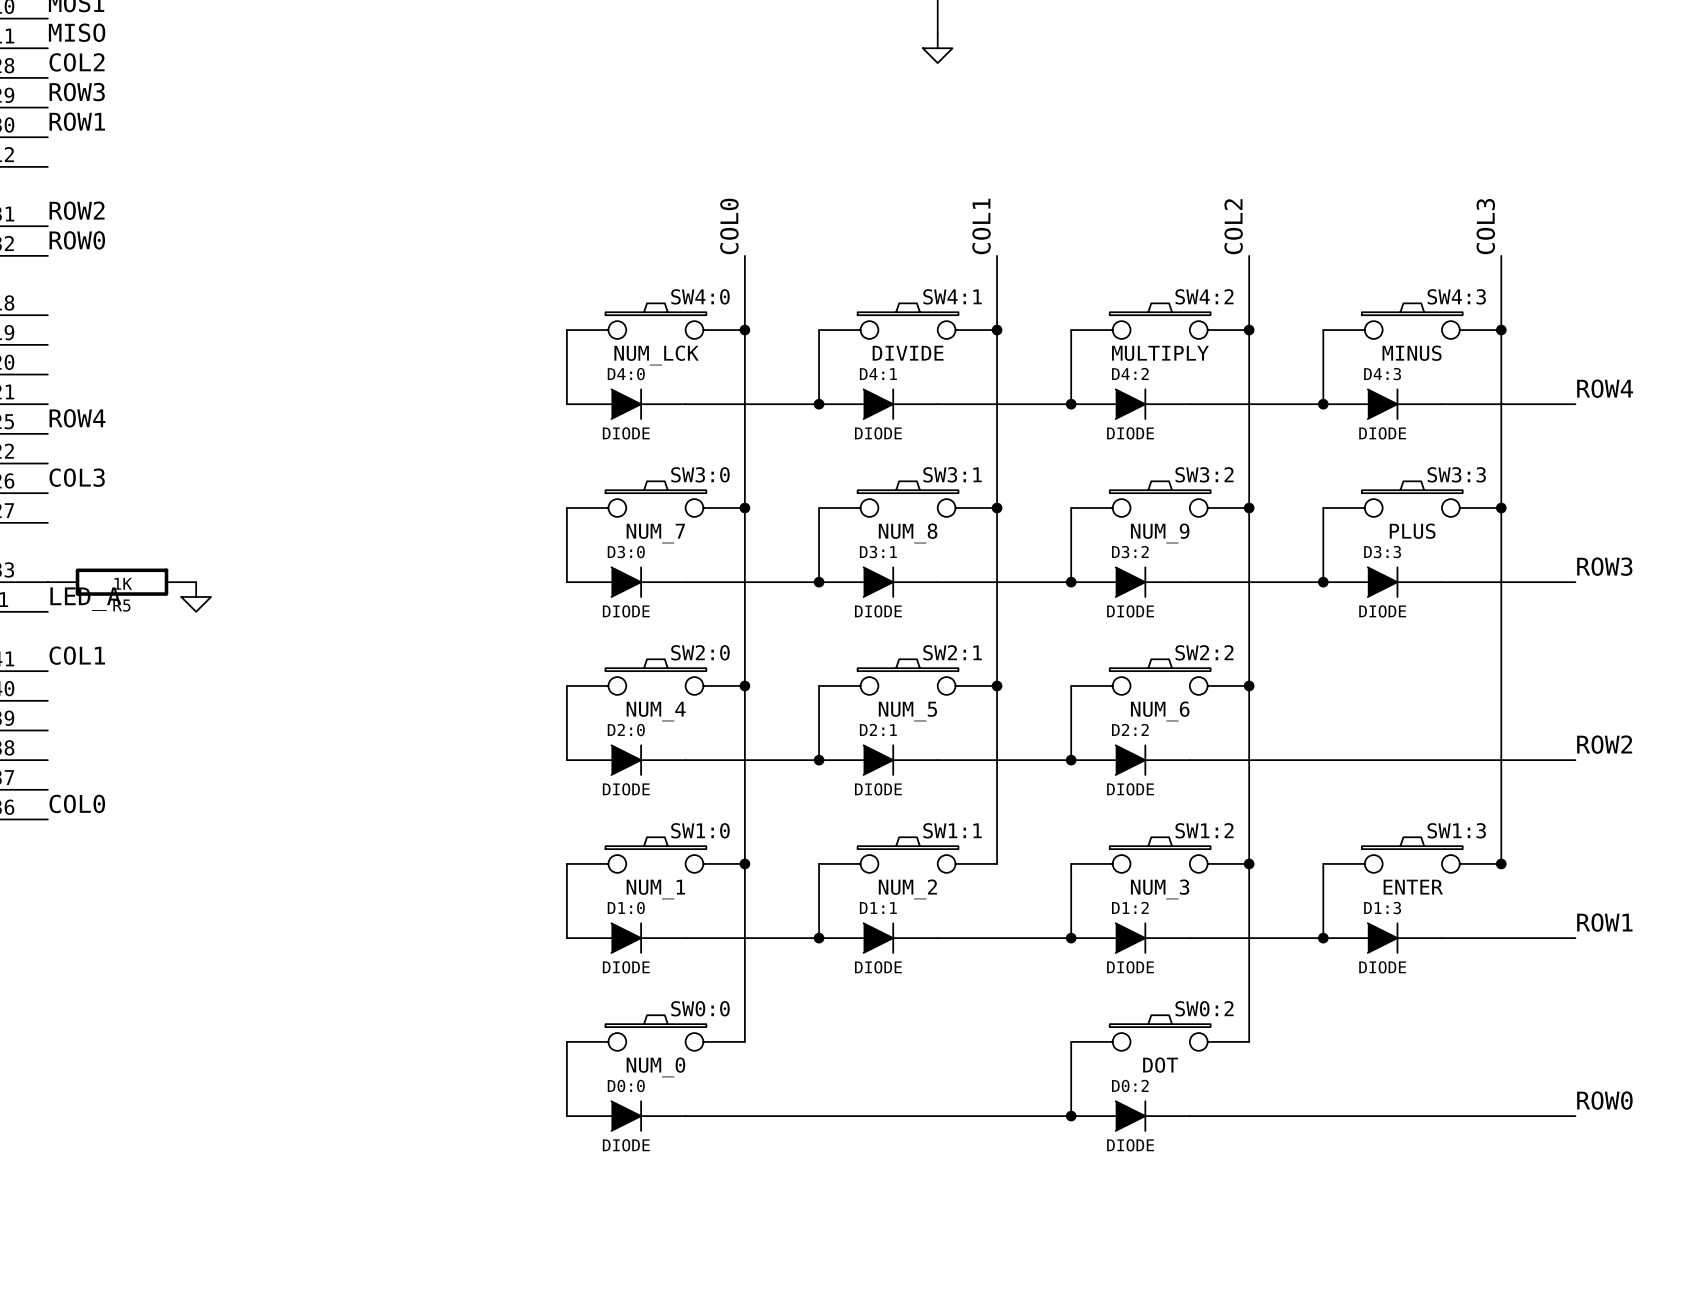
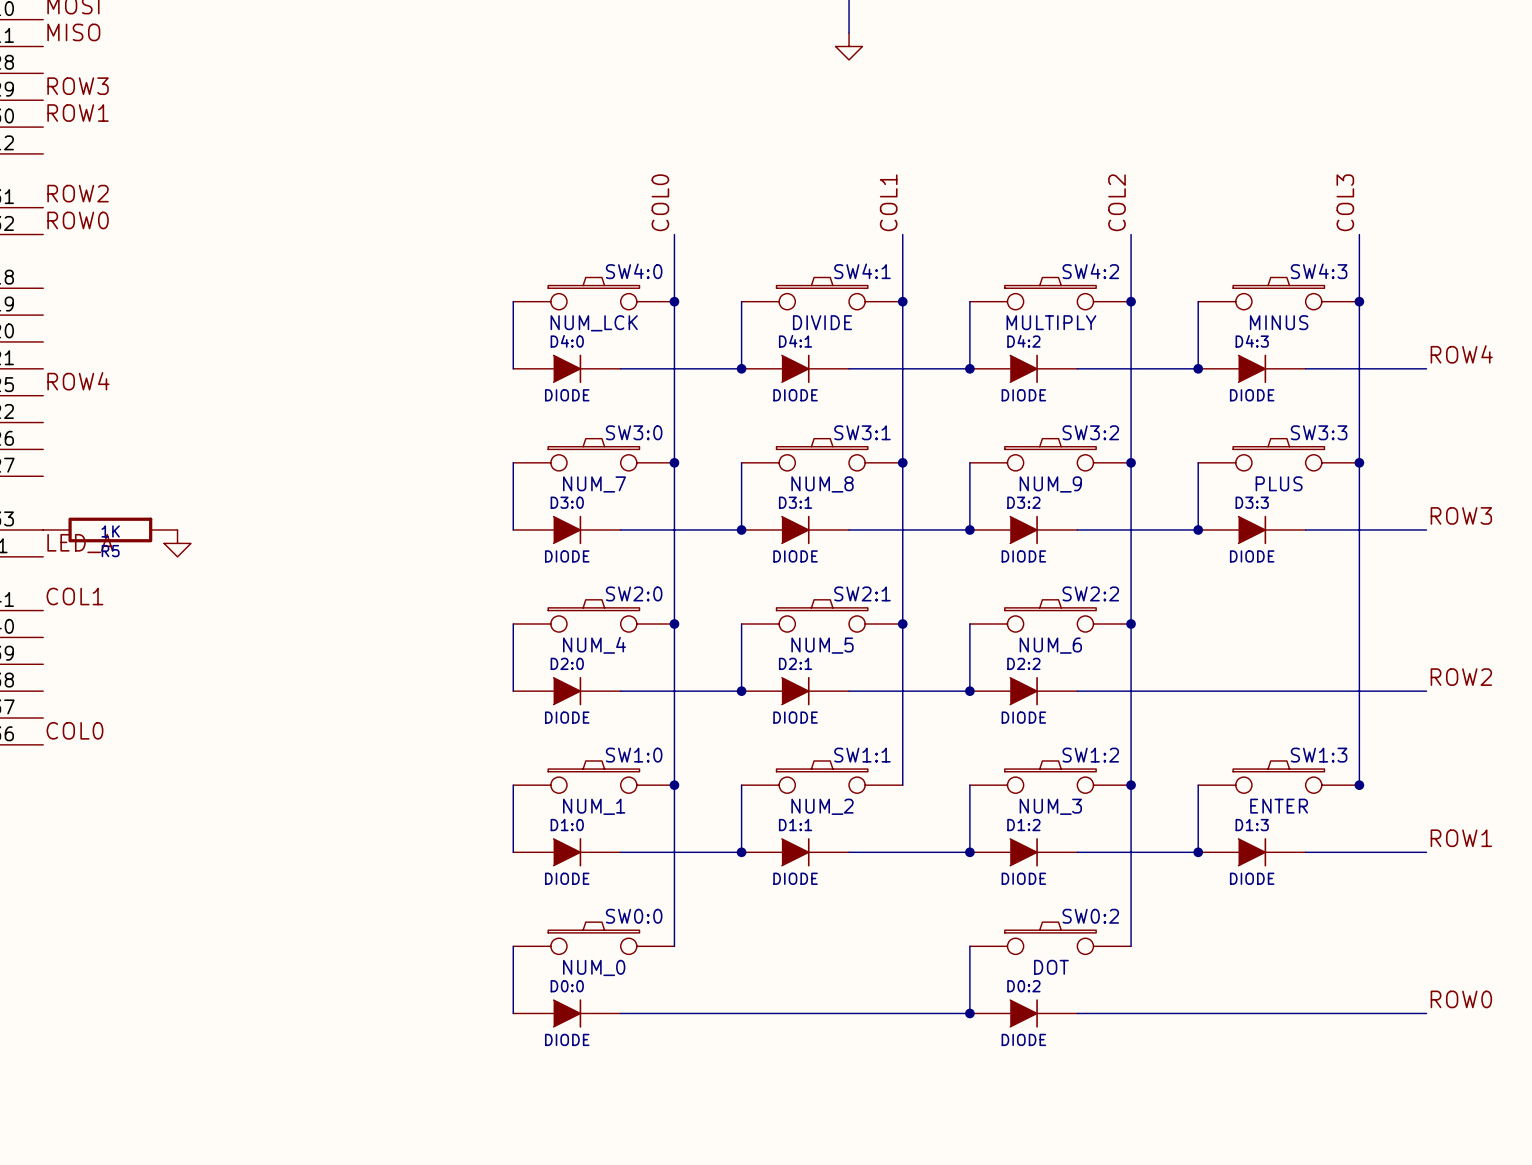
label: COL2 (77, 62) -> none
label: COL3 (77, 477) -> none

